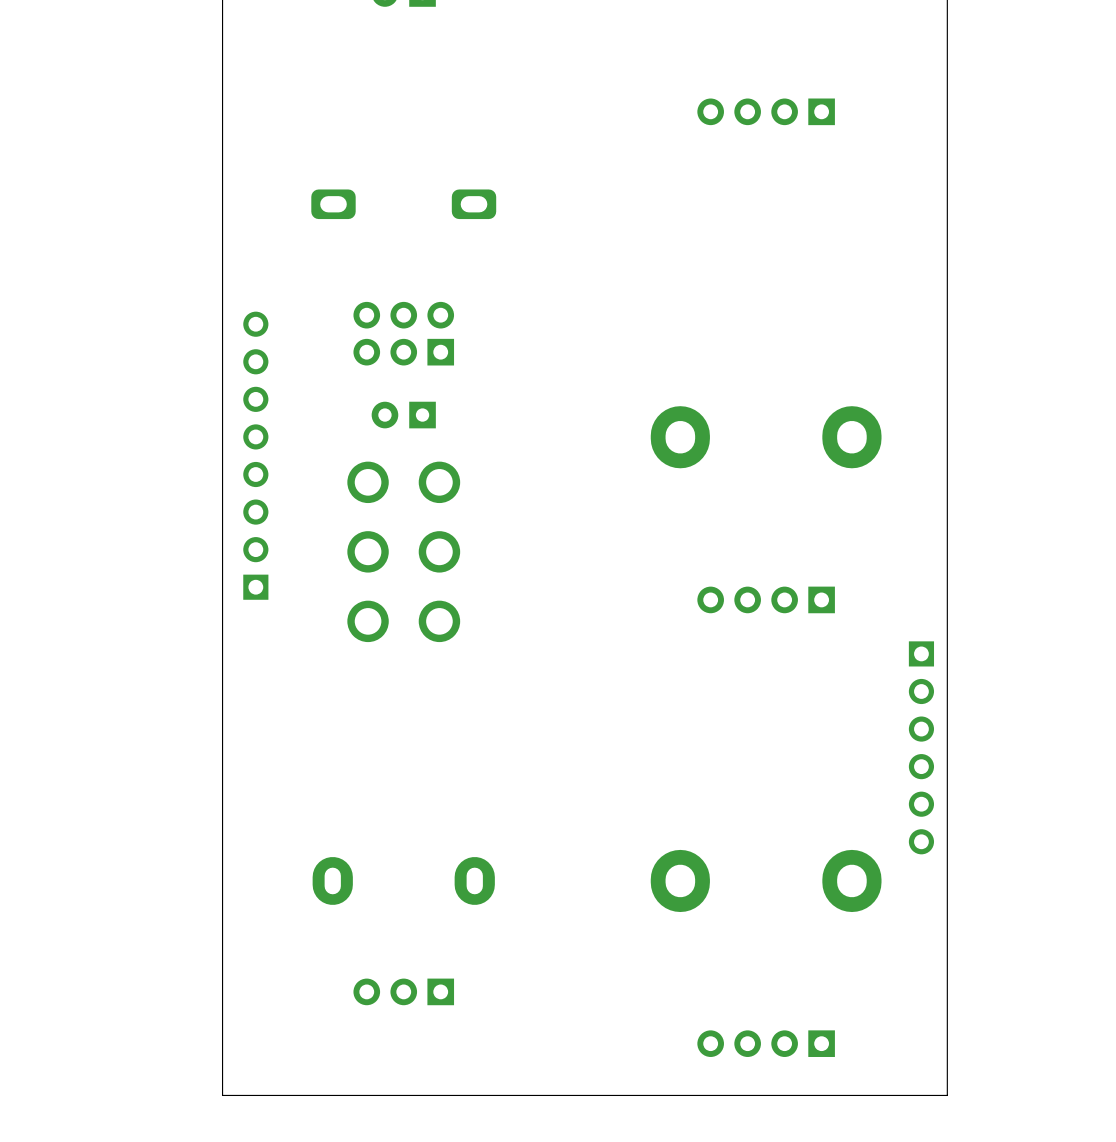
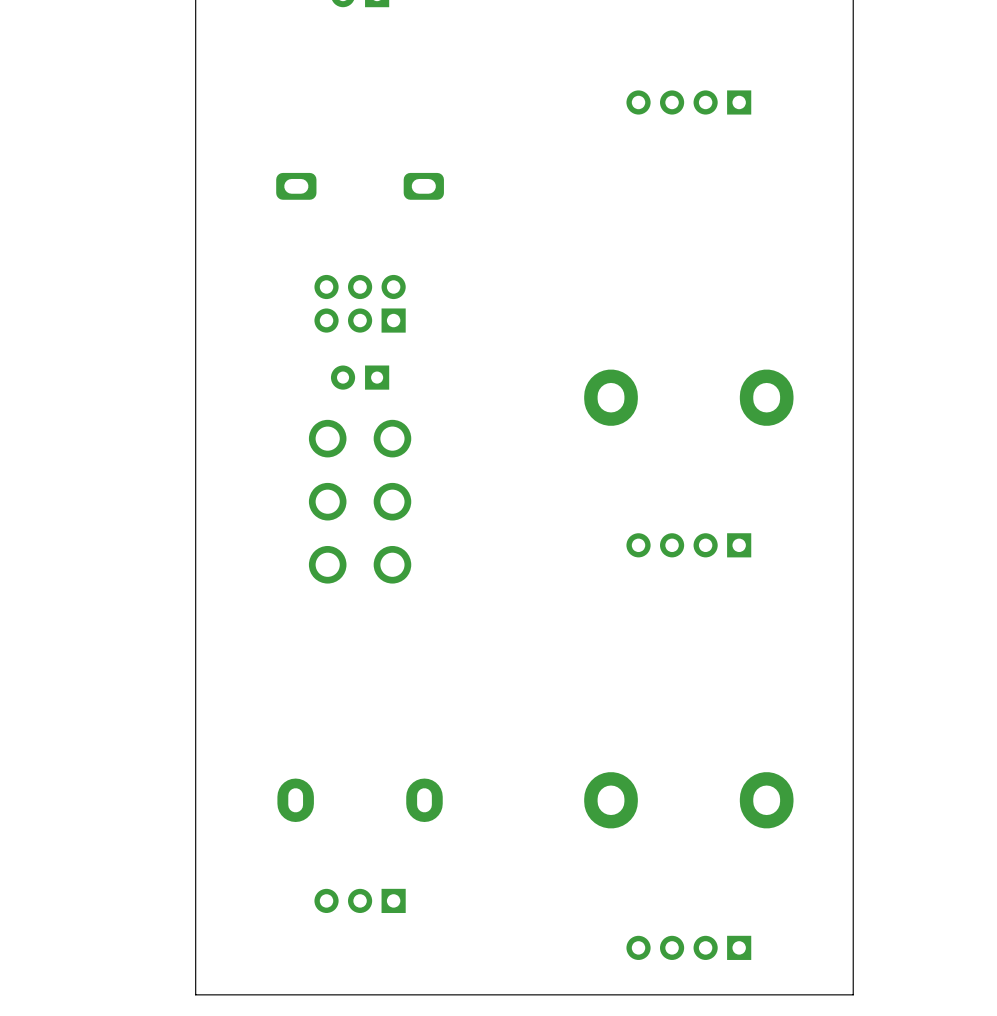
part: (255, 455) -> none
part: (921, 747) -> none

